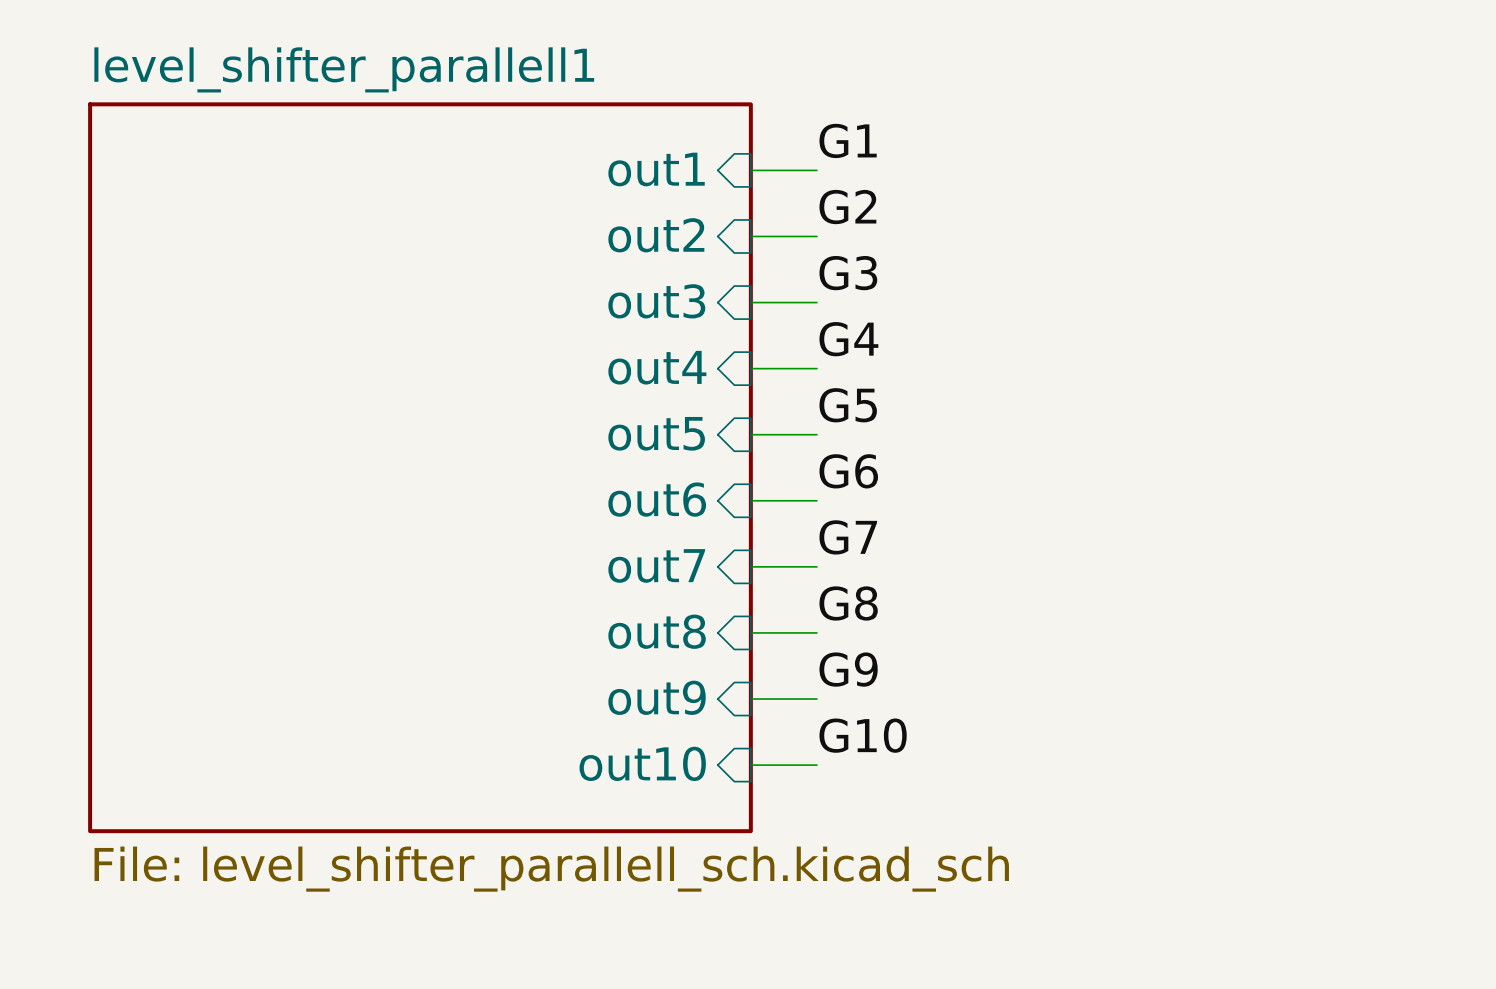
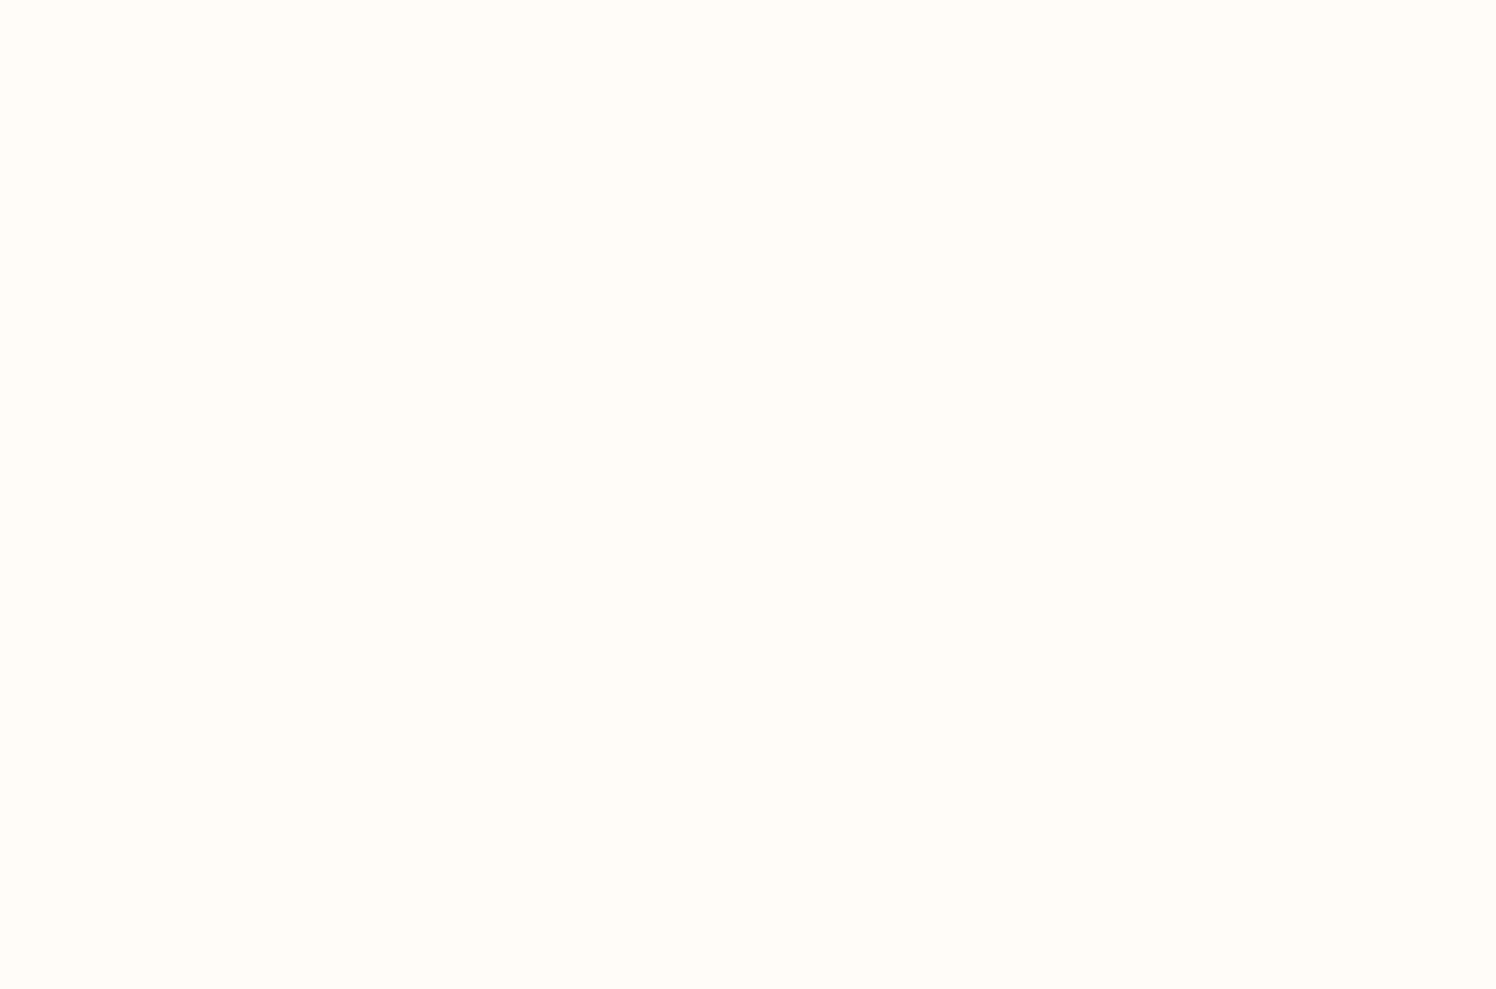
label: G1 (848, 140) -> none
sheet pin: out1 (656, 169) -> none
wire: (750, 170) (816, 170) -> none
label: G2 (847, 207) -> none
sheet pin: out2 (656, 235) -> none
wire: (750, 236) (816, 236) -> none
label: G3 (848, 273) -> none
sheet pin: out3 (656, 301) -> none
wire: (750, 302) (816, 302) -> none
label: G4 (848, 339) -> none
sheet pin: out4 (657, 367) -> none
wire: (750, 368) (816, 368) -> none
label: G5 (848, 405) -> none
sheet pin: out5 (656, 433) -> none
wire: (750, 434) (816, 434) -> none
sheet level_shifter_parallell1: File: level_shifter_parallell_sch.kicad_sch (420, 467) -> none
label: G6 (848, 471) -> none
sheet pin: out6 (657, 499) -> none
wire: (750, 500) (816, 500) -> none
label: G7 (848, 537) -> none
sheet pin: out7 (656, 565) -> none
wire: (750, 566) (816, 566) -> none
label: G8 (848, 603) -> none
sheet pin: out8 (657, 631) -> none
wire: (750, 632) (816, 632) -> none
label: G9 (848, 669) -> none
sheet pin: out9 (657, 697) -> none
wire: (750, 699) (816, 699) -> none
label: G10 (863, 735) -> none
sheet pin: out10 (642, 763) -> none
wire: (750, 765) (816, 765) -> none

